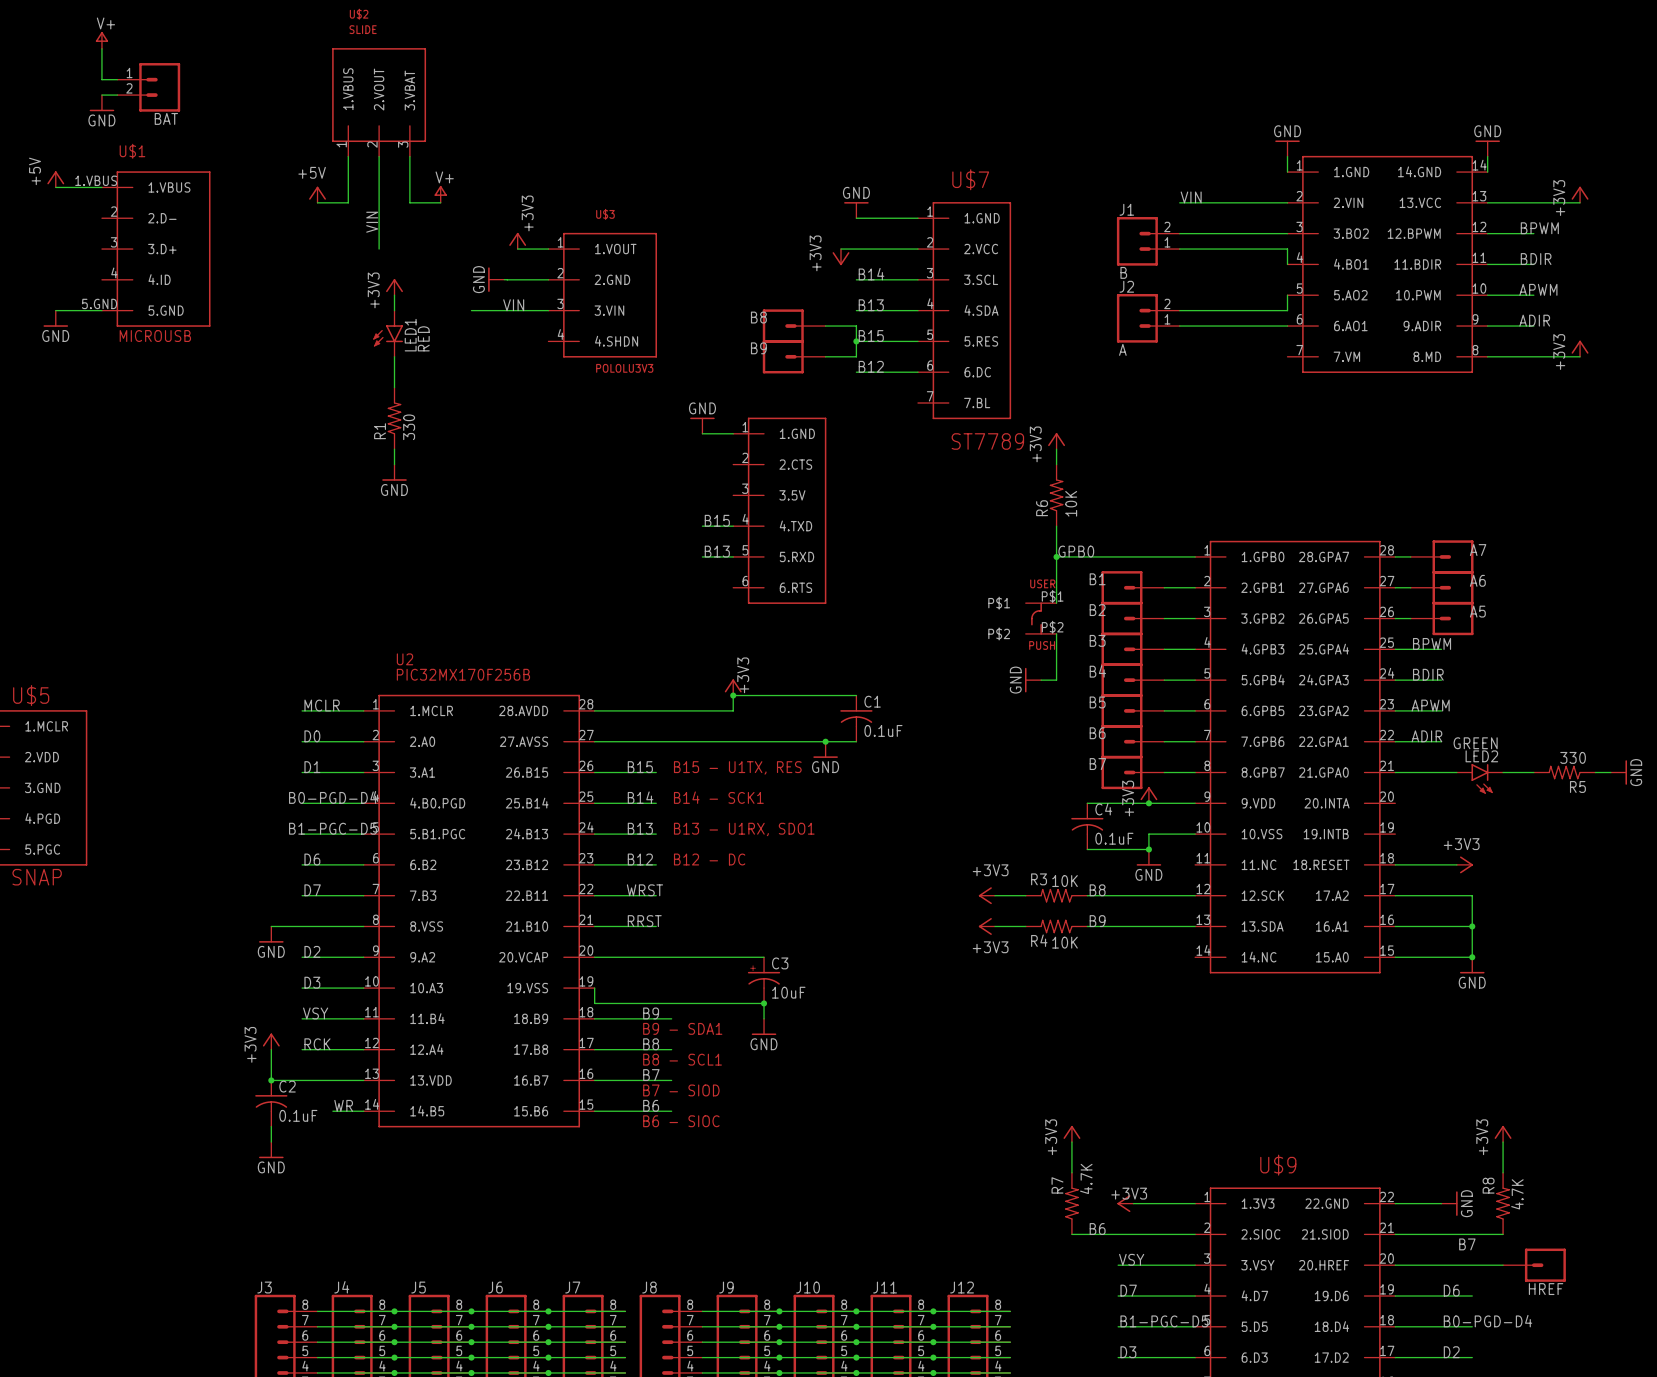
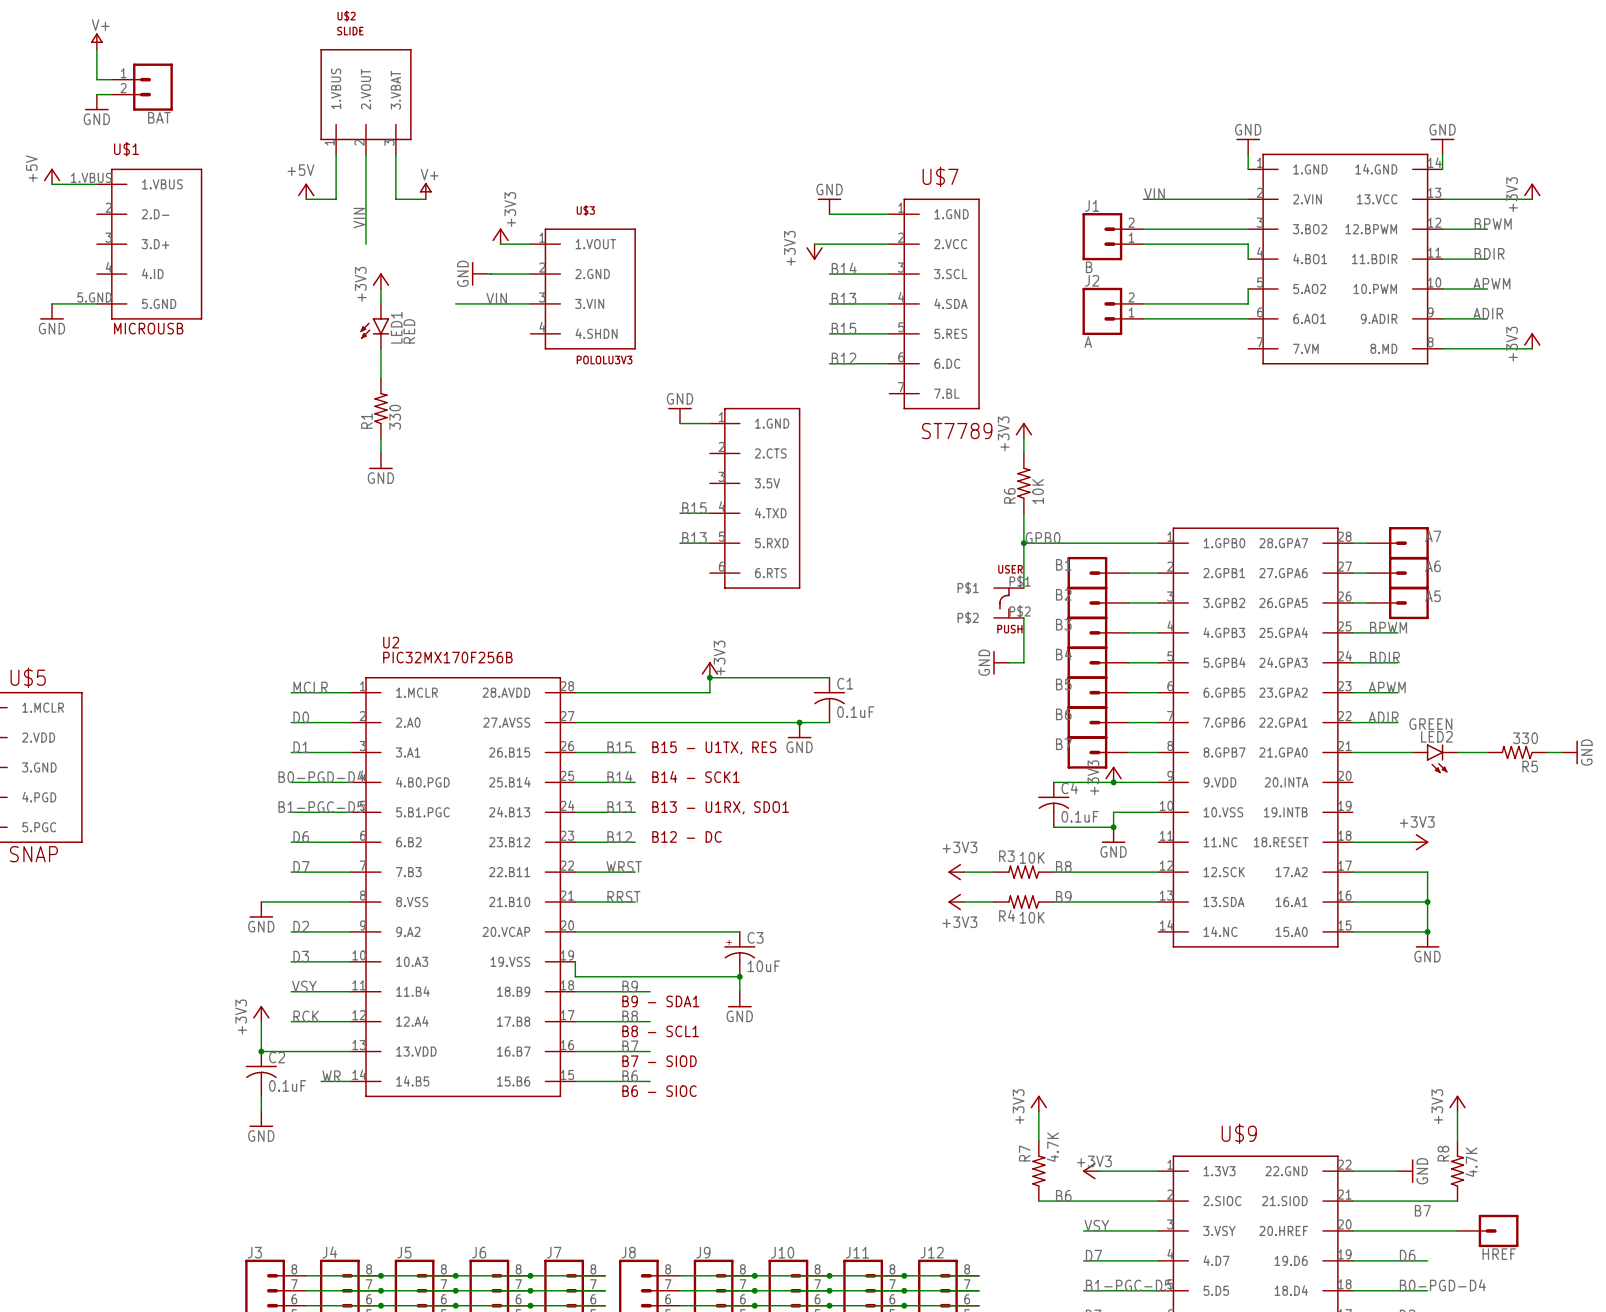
B8: (794, 326) -> none
wire: (825, 326) (856, 326) (856, 356) (825, 356) -> none
junction: (856, 341) -> none
B9: (794, 356) -> none

